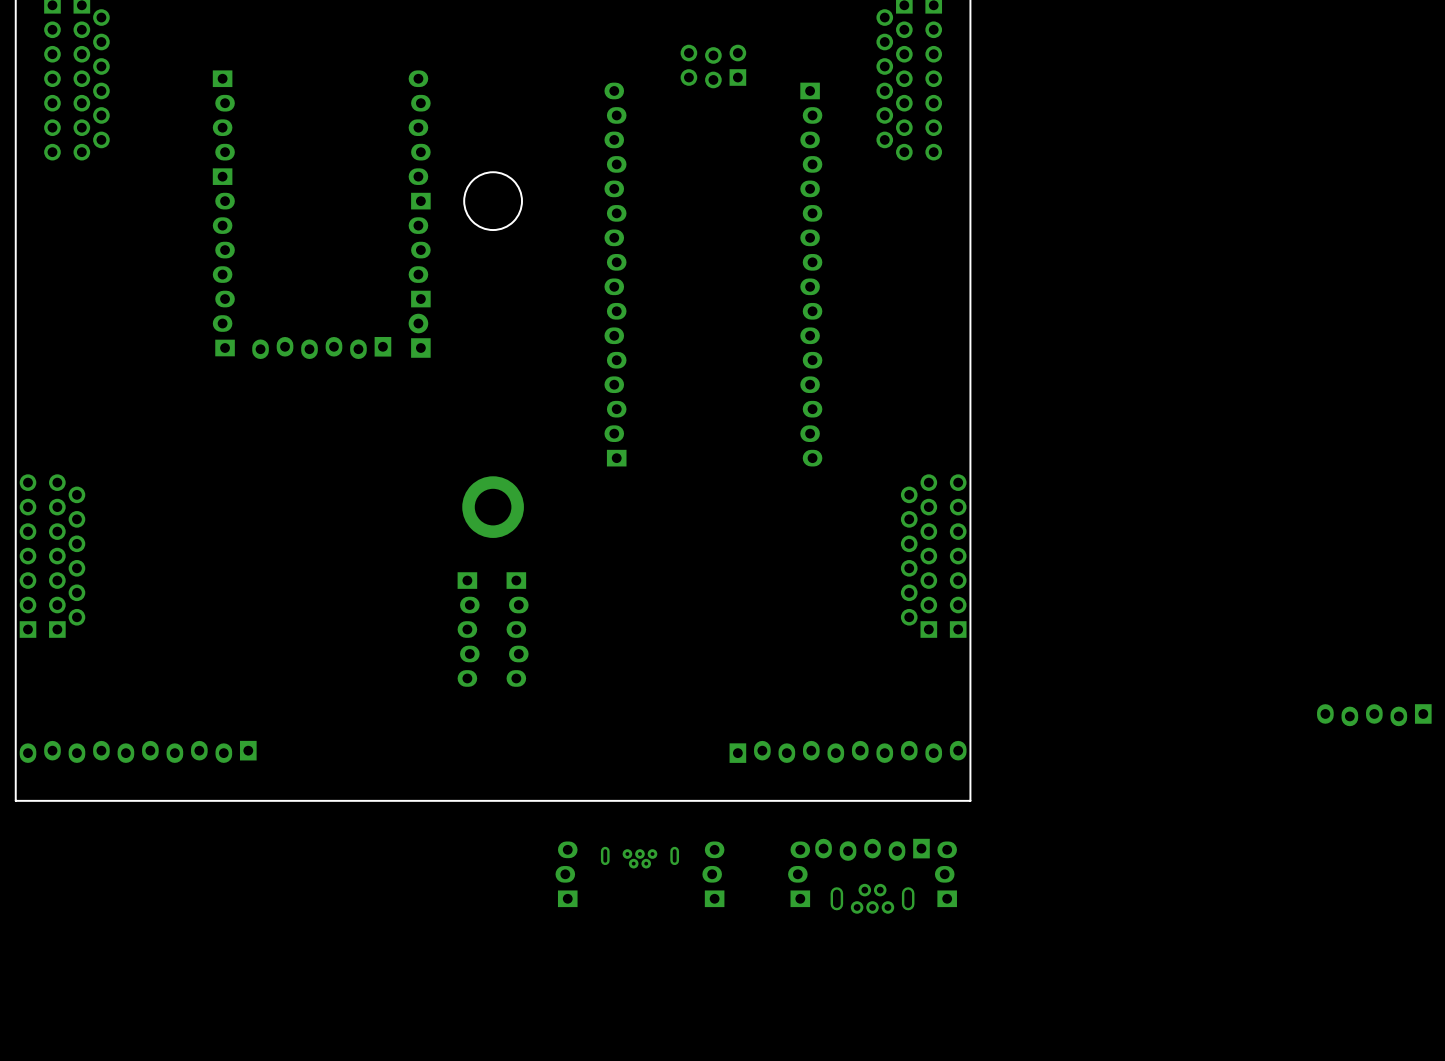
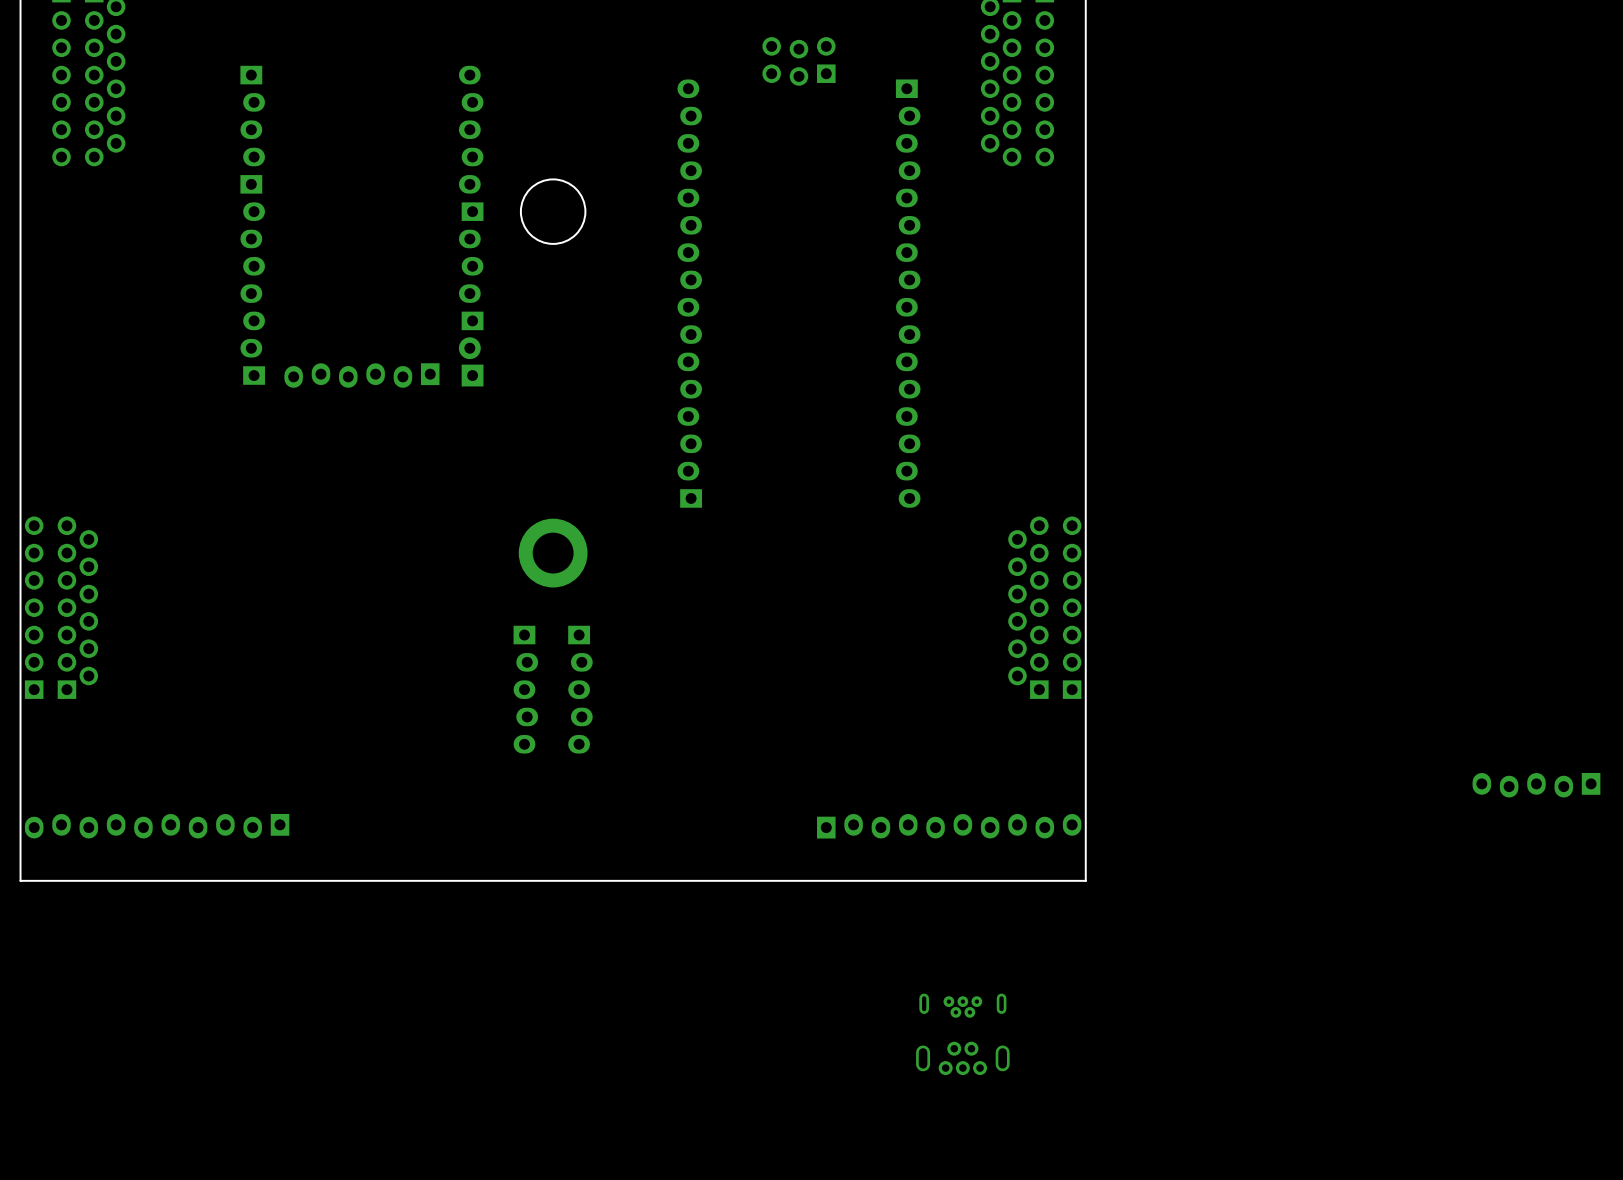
part: (872, 849) -> none
part position: (639, 857) -> (962, 1005)
part: (566, 874) -> none
part: (713, 874) -> none
part: (799, 874) -> none
part: (945, 874) -> none
part position: (872, 898) -> (962, 1058)

